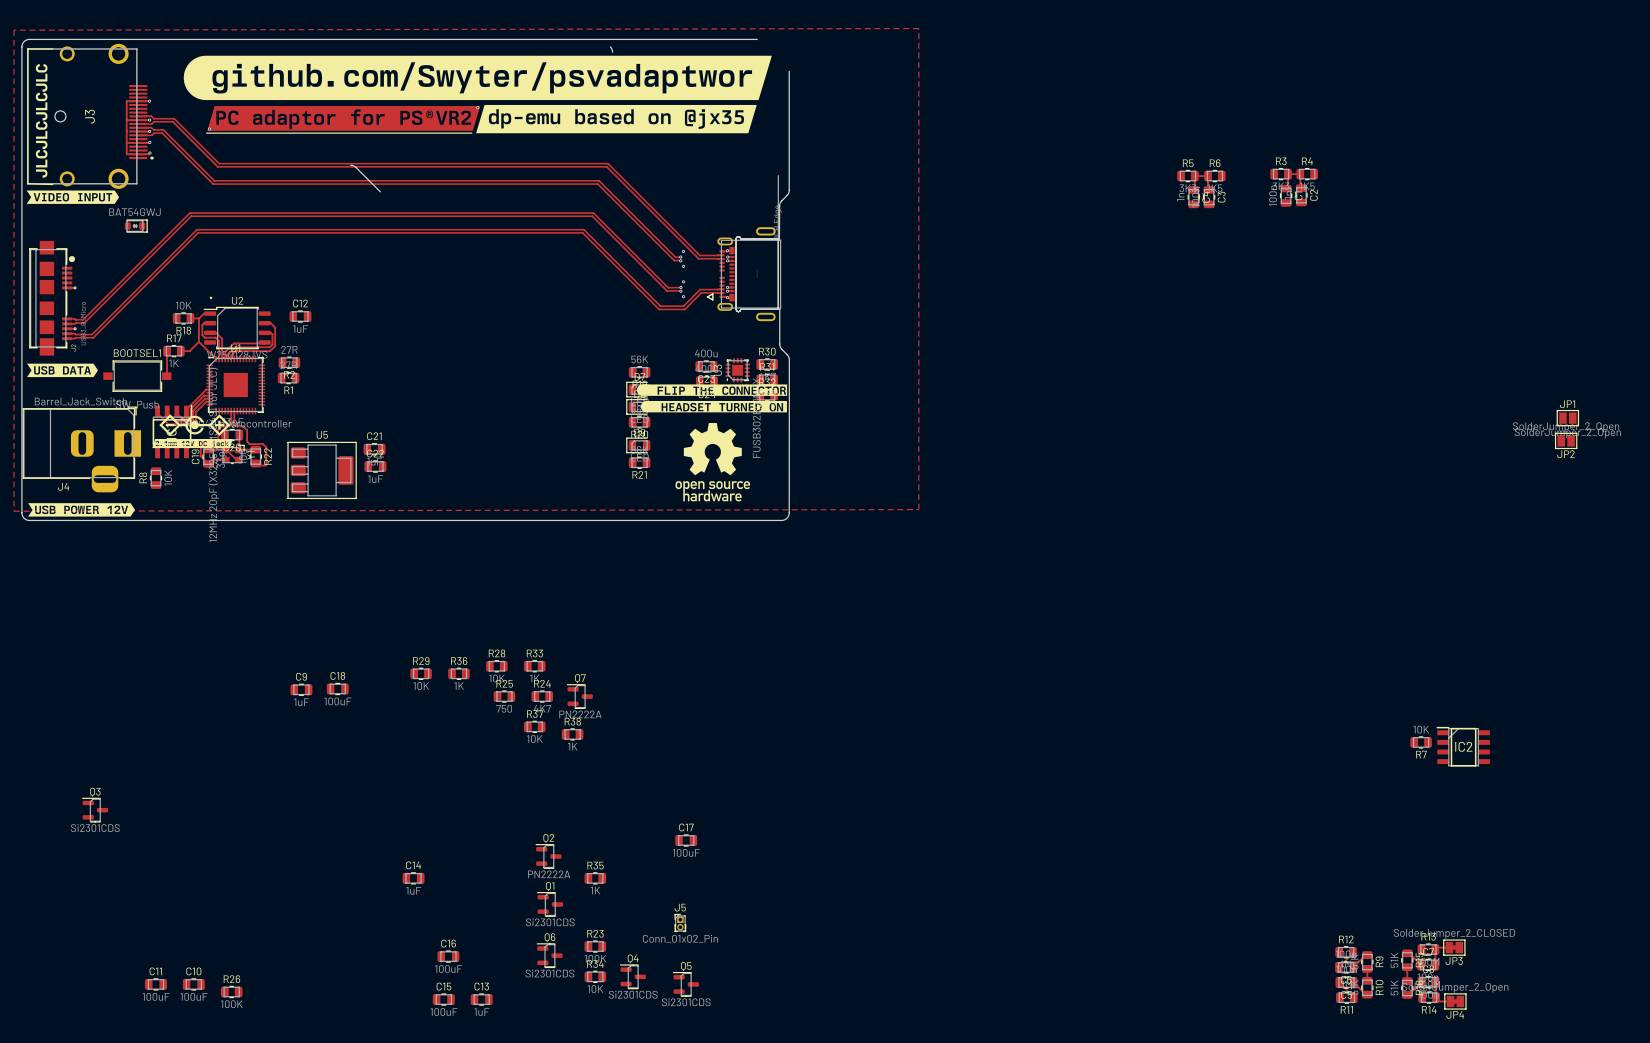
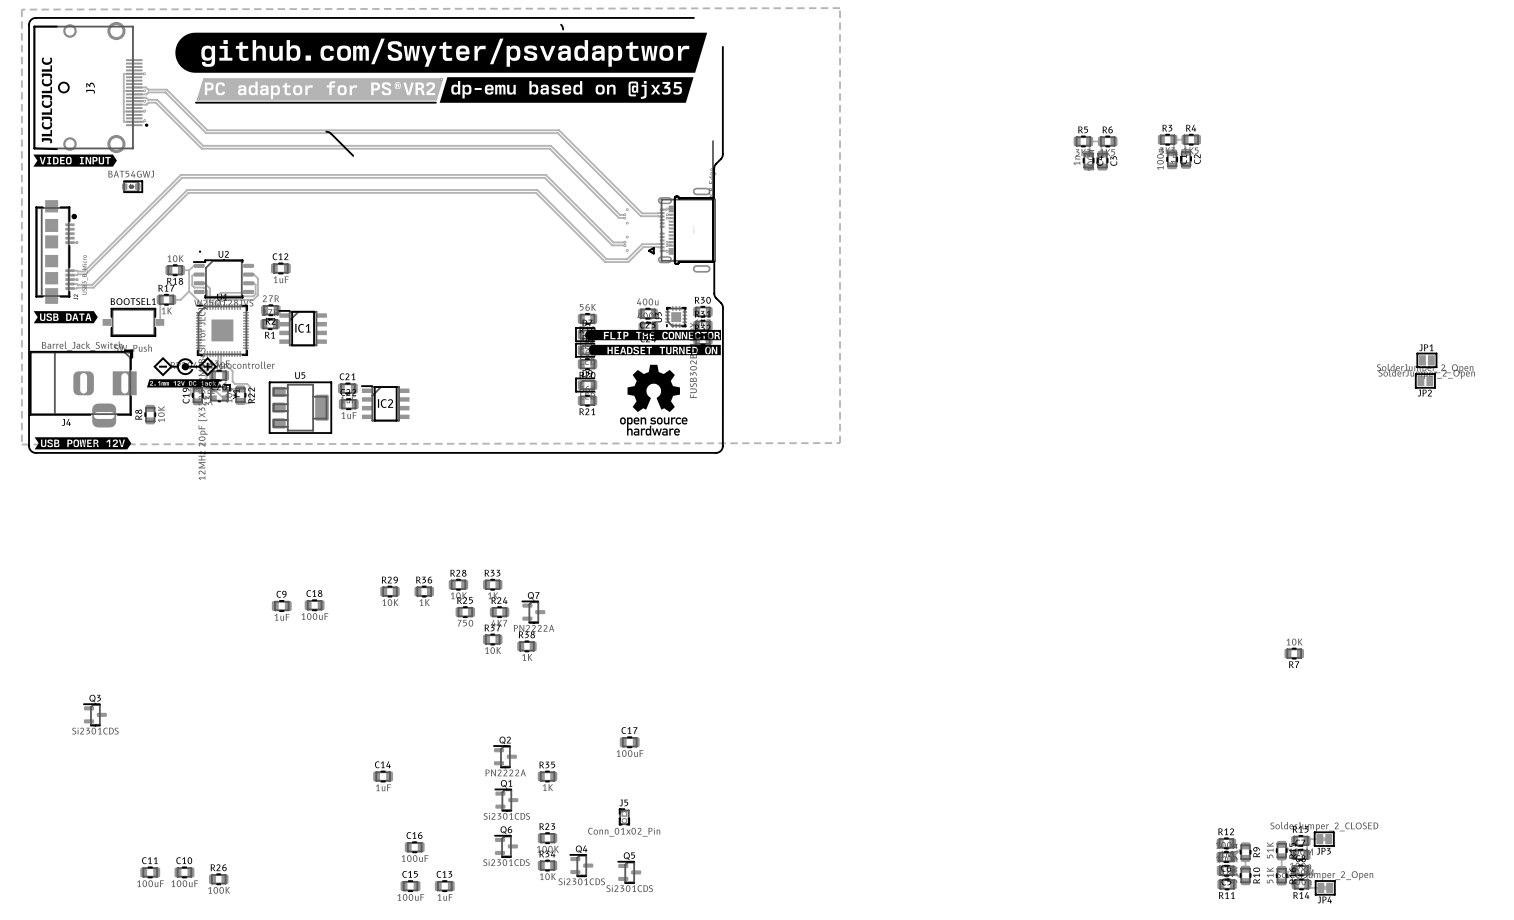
track: (209, 389) (206, 389) (186, 411) -> none
track: (209, 395) (204, 395) (190, 409) (190, 418) (182, 418) (176, 411) -> none
track: (209, 398) (205, 398) (193, 410) (191, 421) (175, 421) (167, 411) -> none
track: (209, 401) (206, 401) (195, 412) (195, 421) (193, 424) (168, 424) (157, 411) -> none
IC1 rotation: 0° (172, 431) -> 90° counterclockwise (302, 328)
IC1 position: (172, 431) -> (302, 328)
IC2 position: (1463, 746) -> (385, 403)

